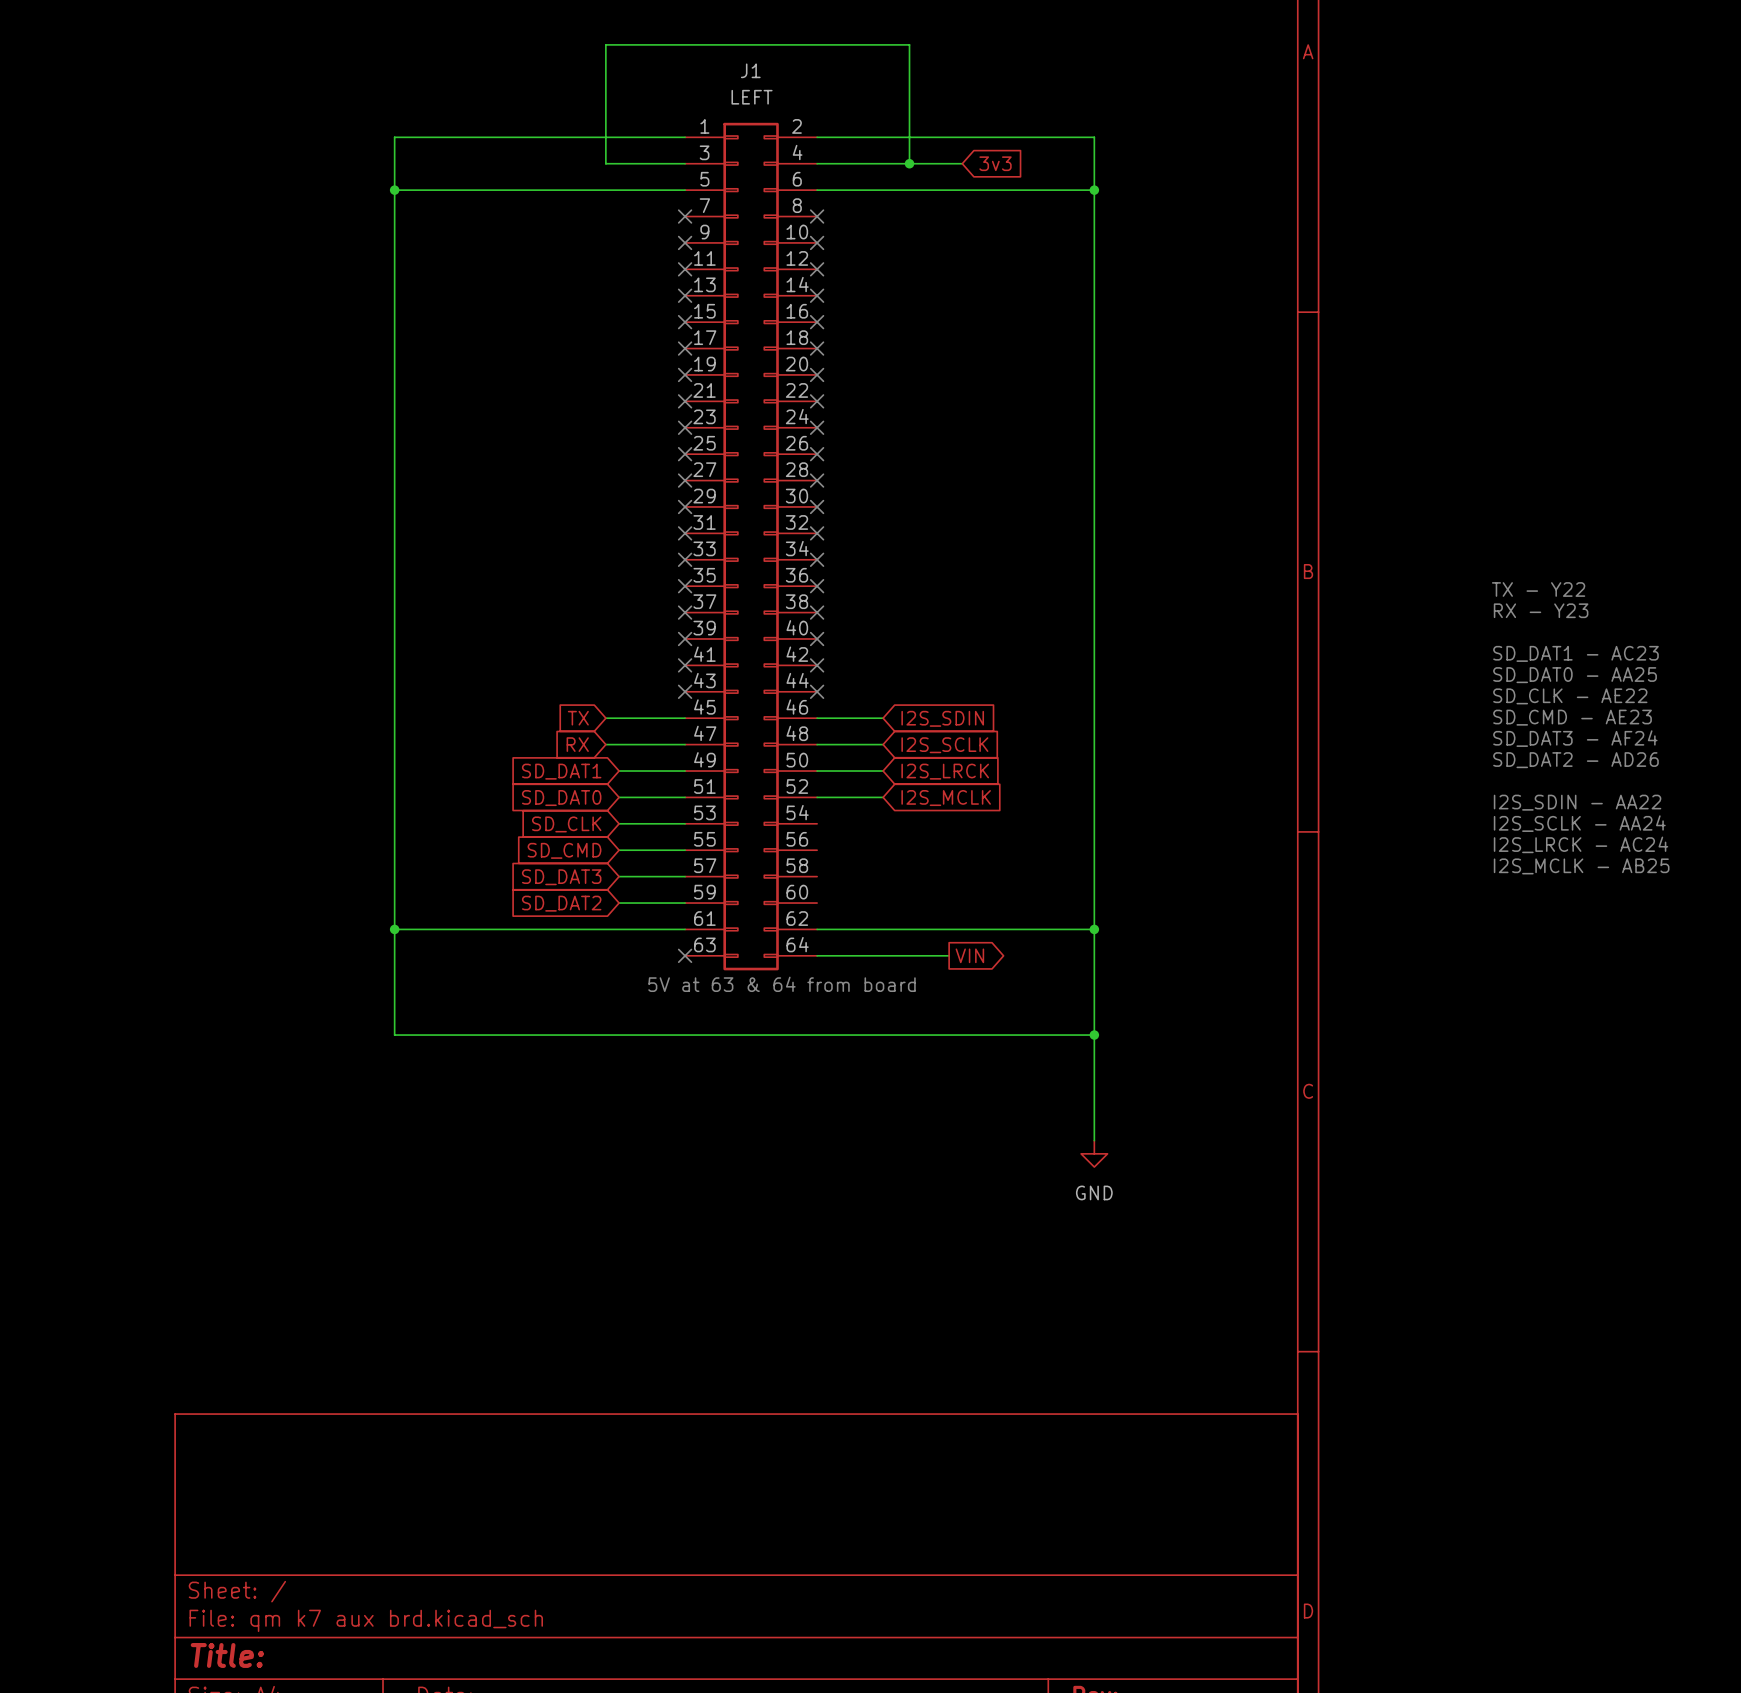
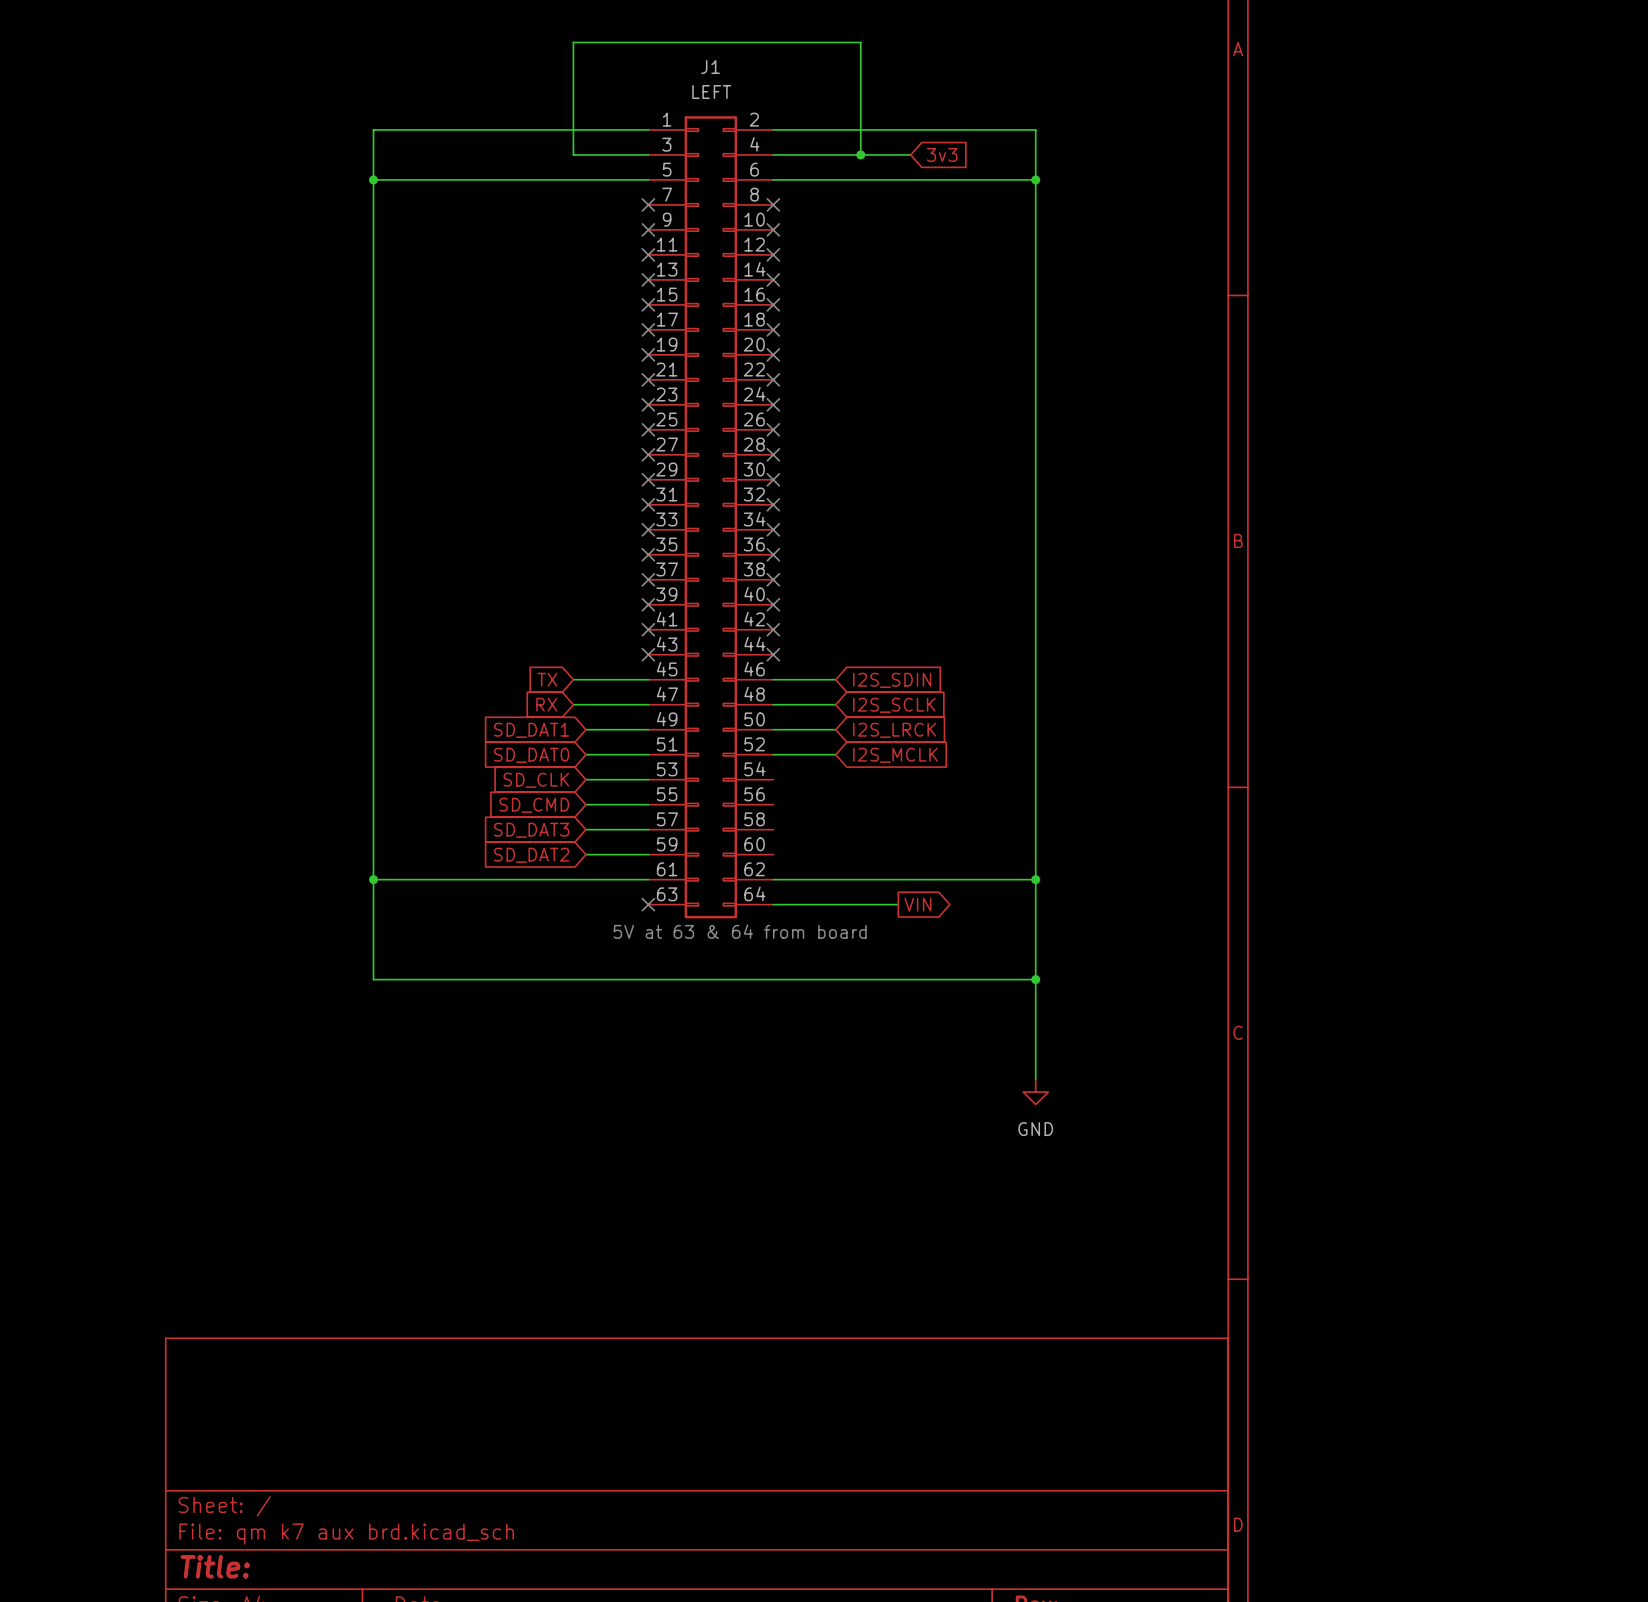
text: TX - Y22 (1538, 589) -> none
text: RX - Y23 (1541, 610) -> none
text: SD_DAT1 - AC23 (1575, 653) -> none
text: SD_DAT0 - AA25 (1575, 675) -> none
text: SD_CLK - AE22 (1570, 696) -> none
text: SD_CMD - AE23 (1572, 717) -> none
text: SD_DAT3 - AF24 (1575, 738) -> none
text: SD_DAT2 - AD26 (1575, 760) -> none
text: I2S_SDIN - AA22 (1577, 802) -> none
text: I2S_SCLK - AA24 (1579, 823) -> none
text: I2S_LRCK - AC24 (1581, 844) -> none
text: I2S_MCLK - AB25 (1581, 866) -> none

